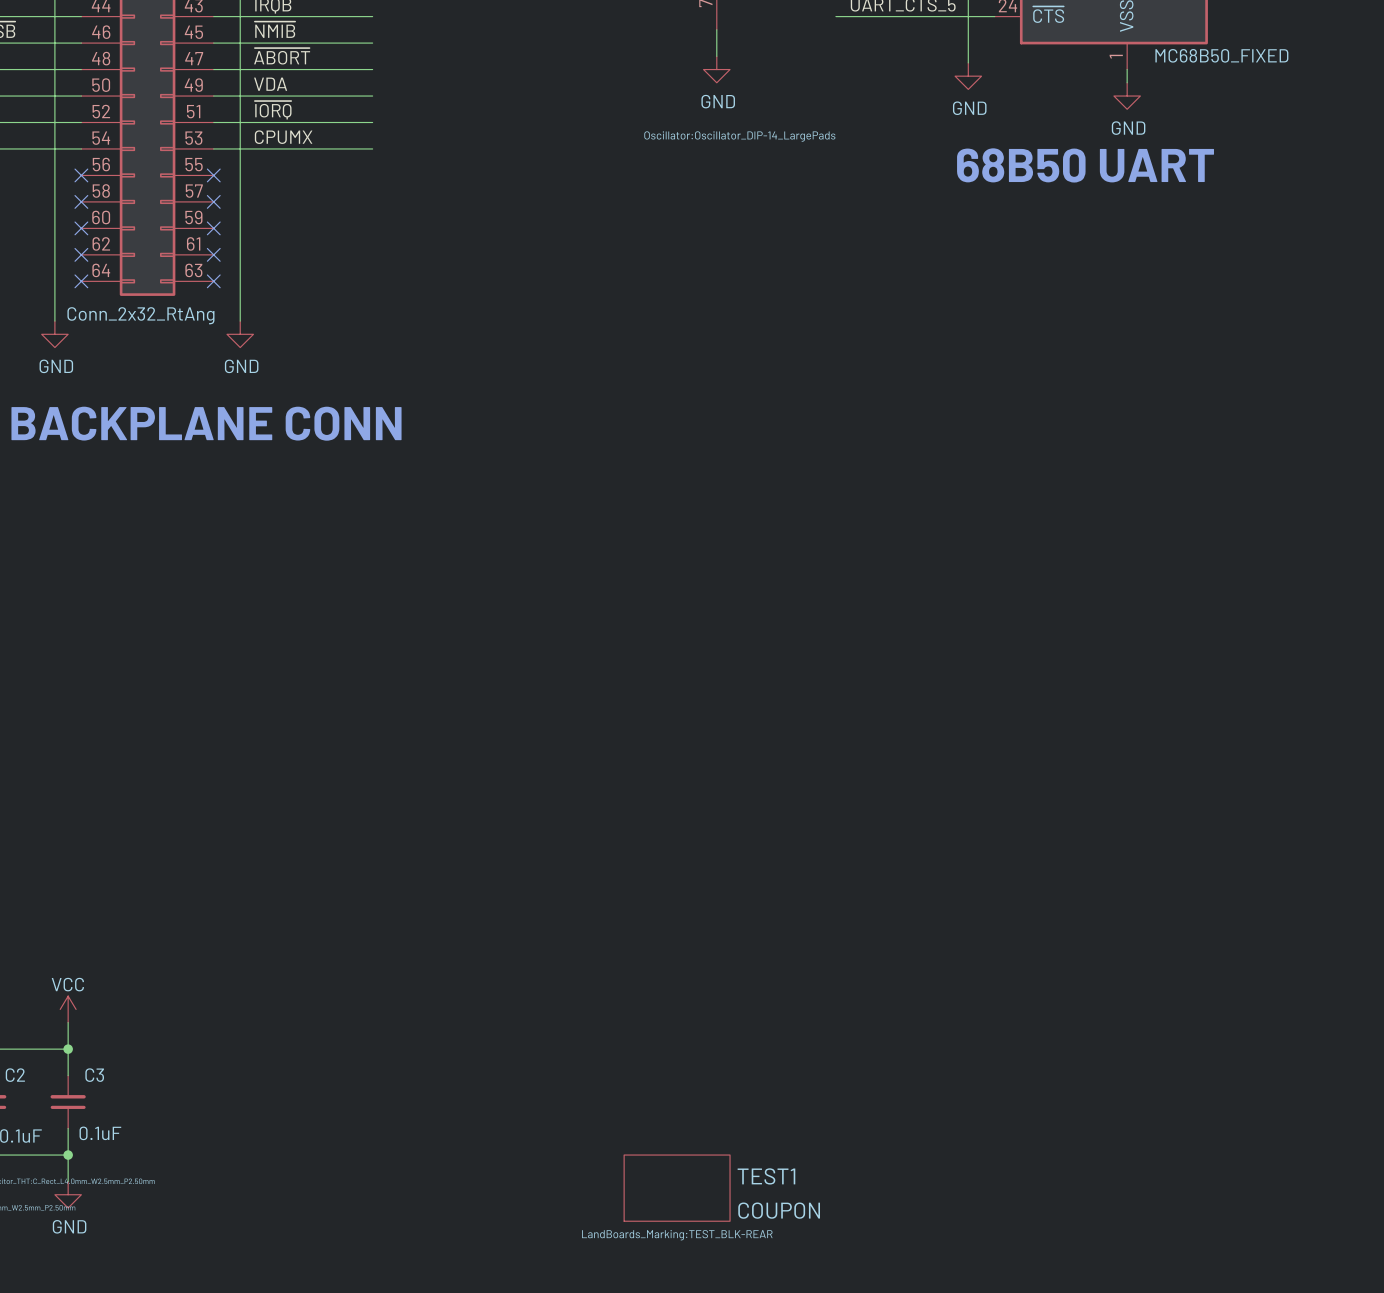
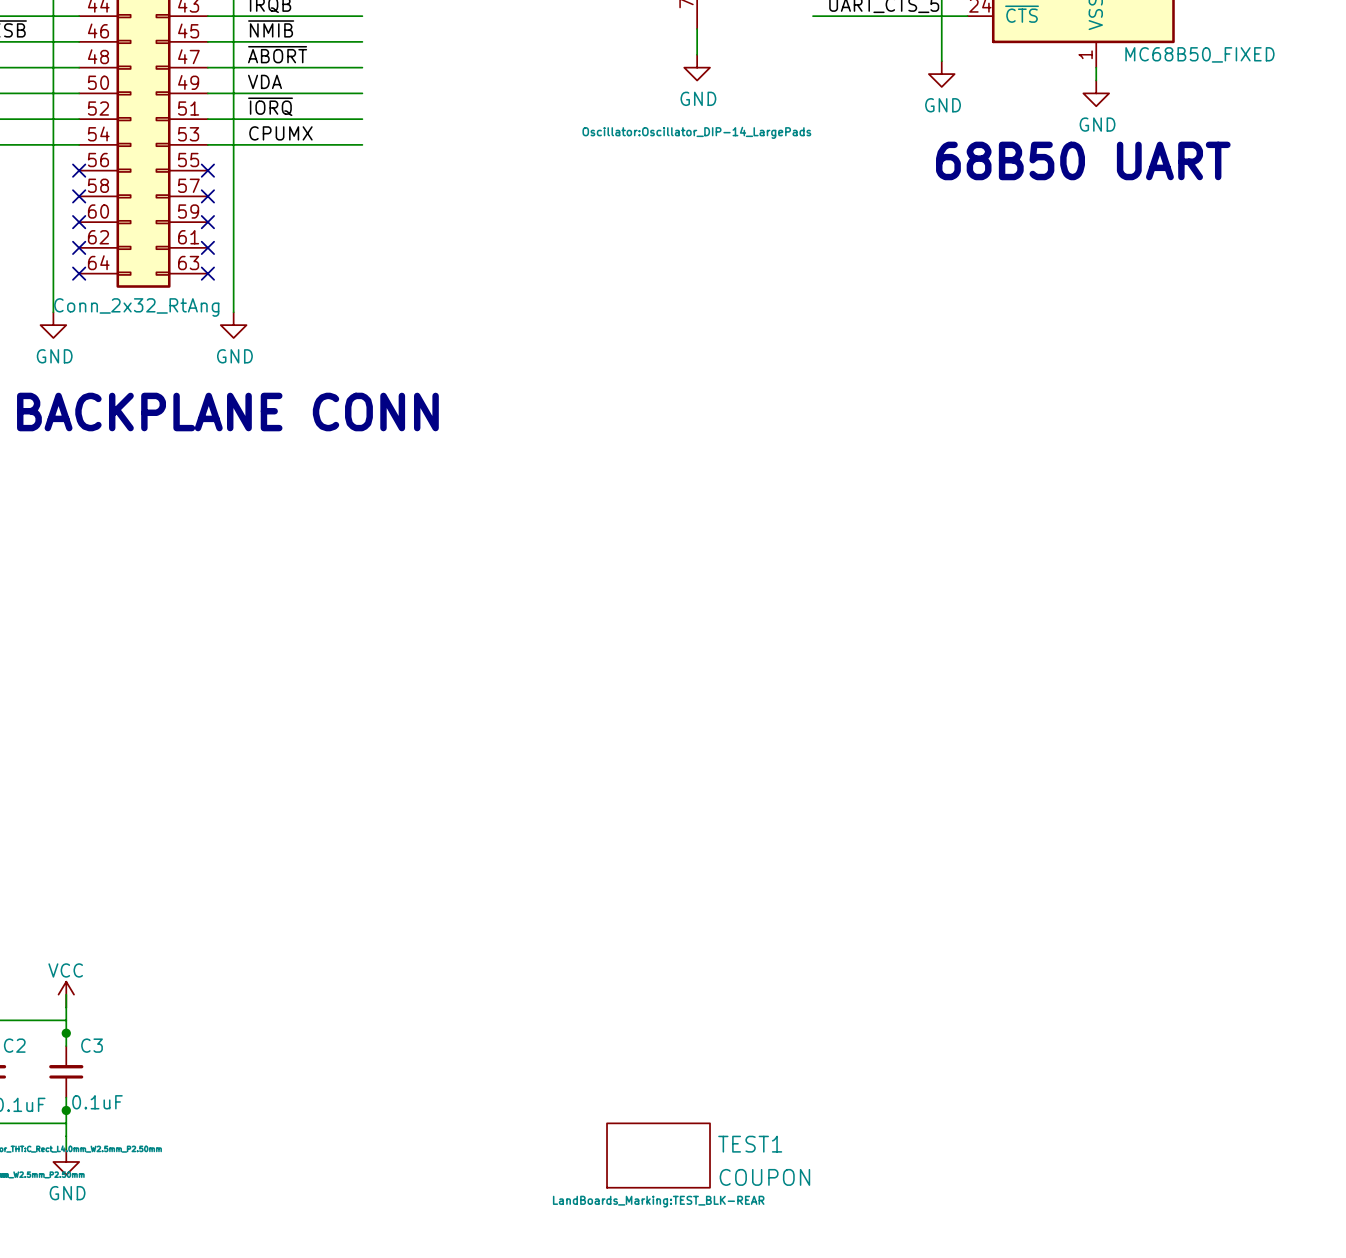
power symbol position: VCC (68, 1009) -> VCC (66, 994)
junction position: (68, 1049) -> (66, 1033)
junction position: (68, 1155) -> (66, 1110)

